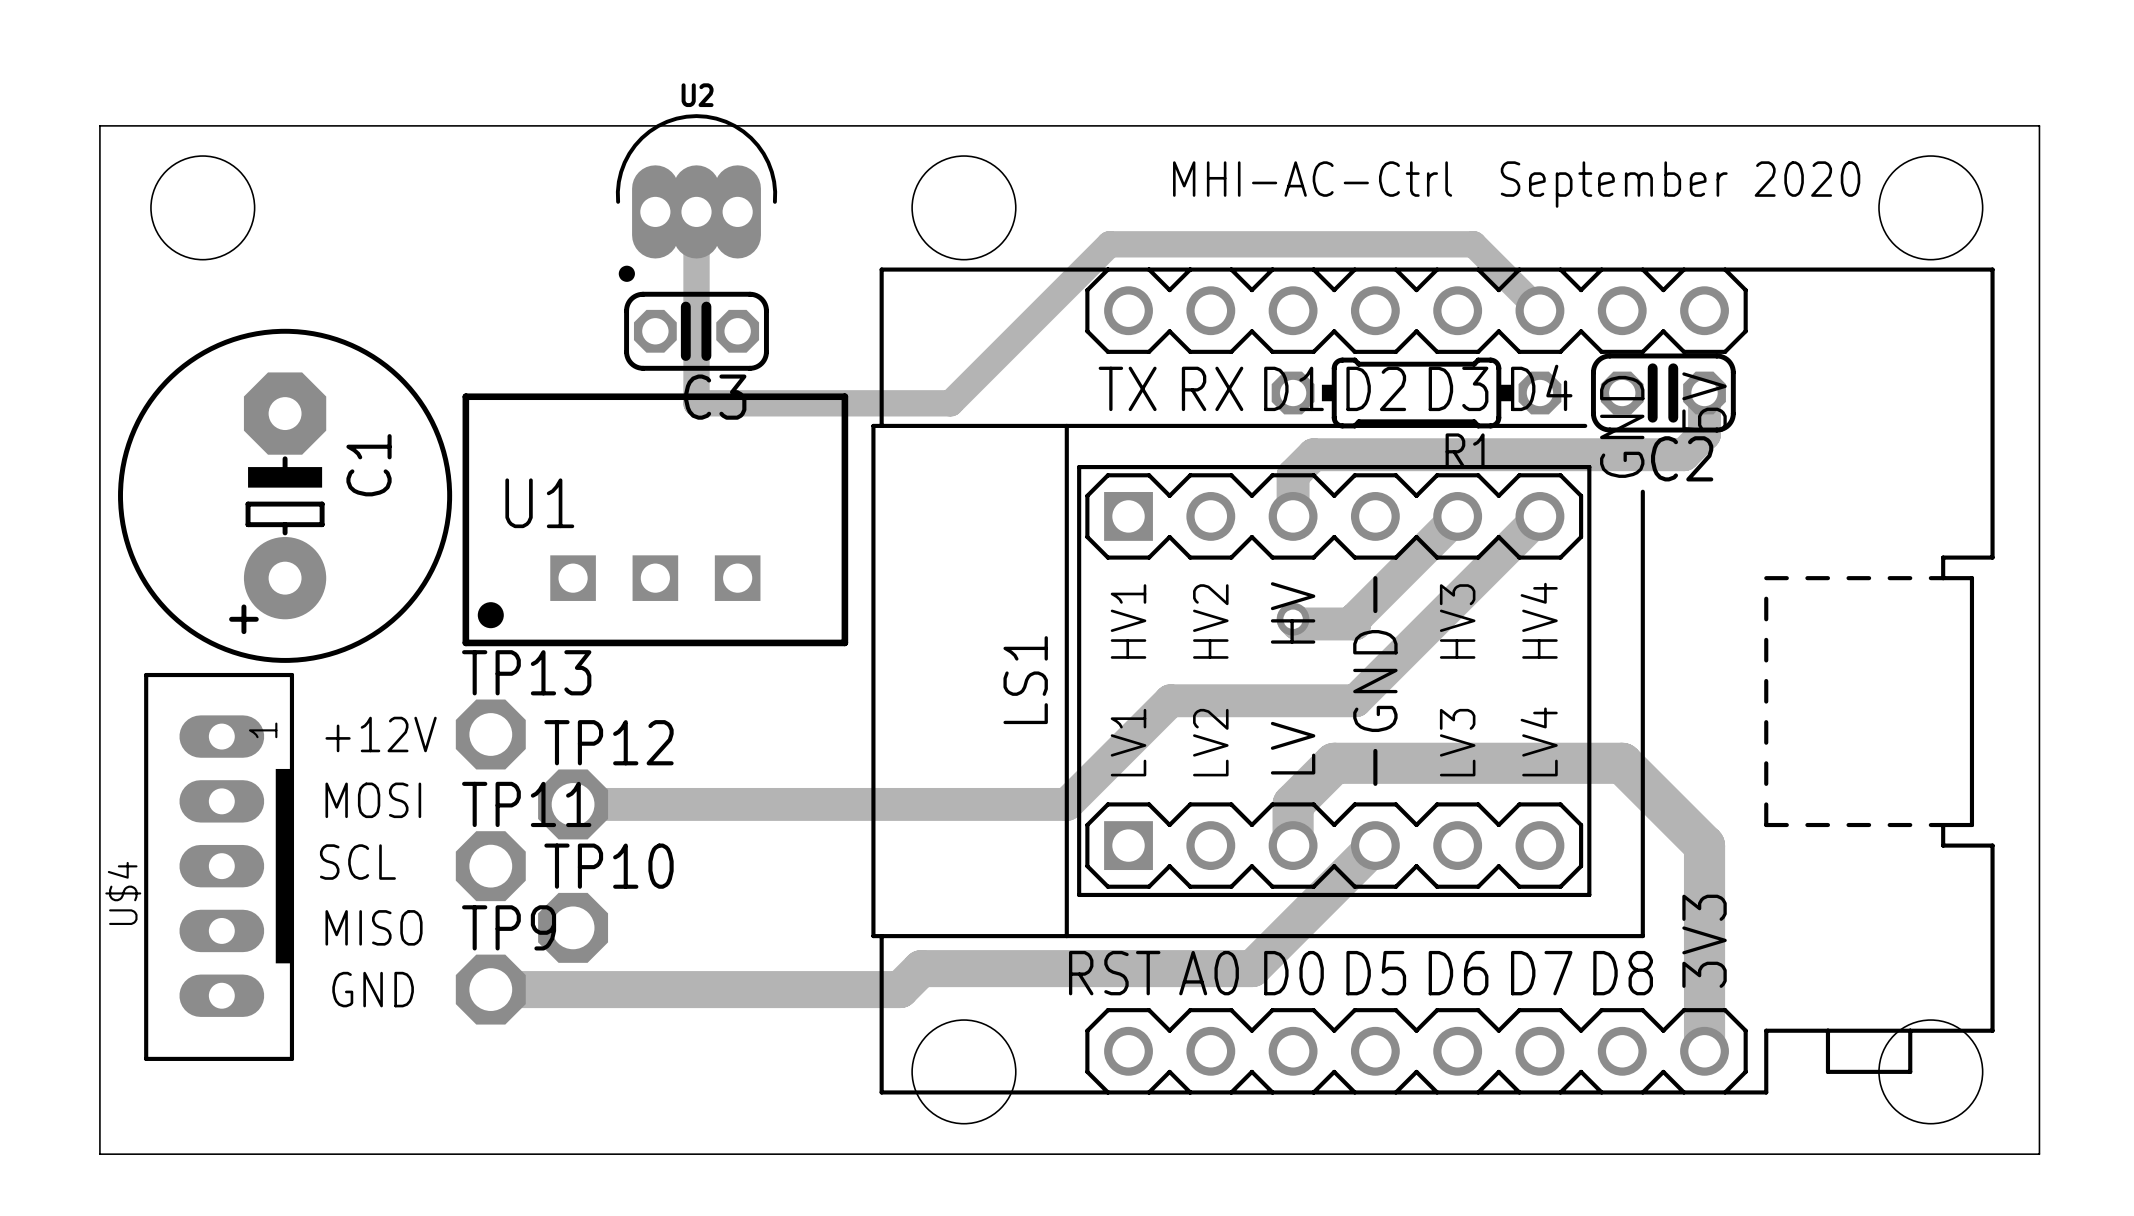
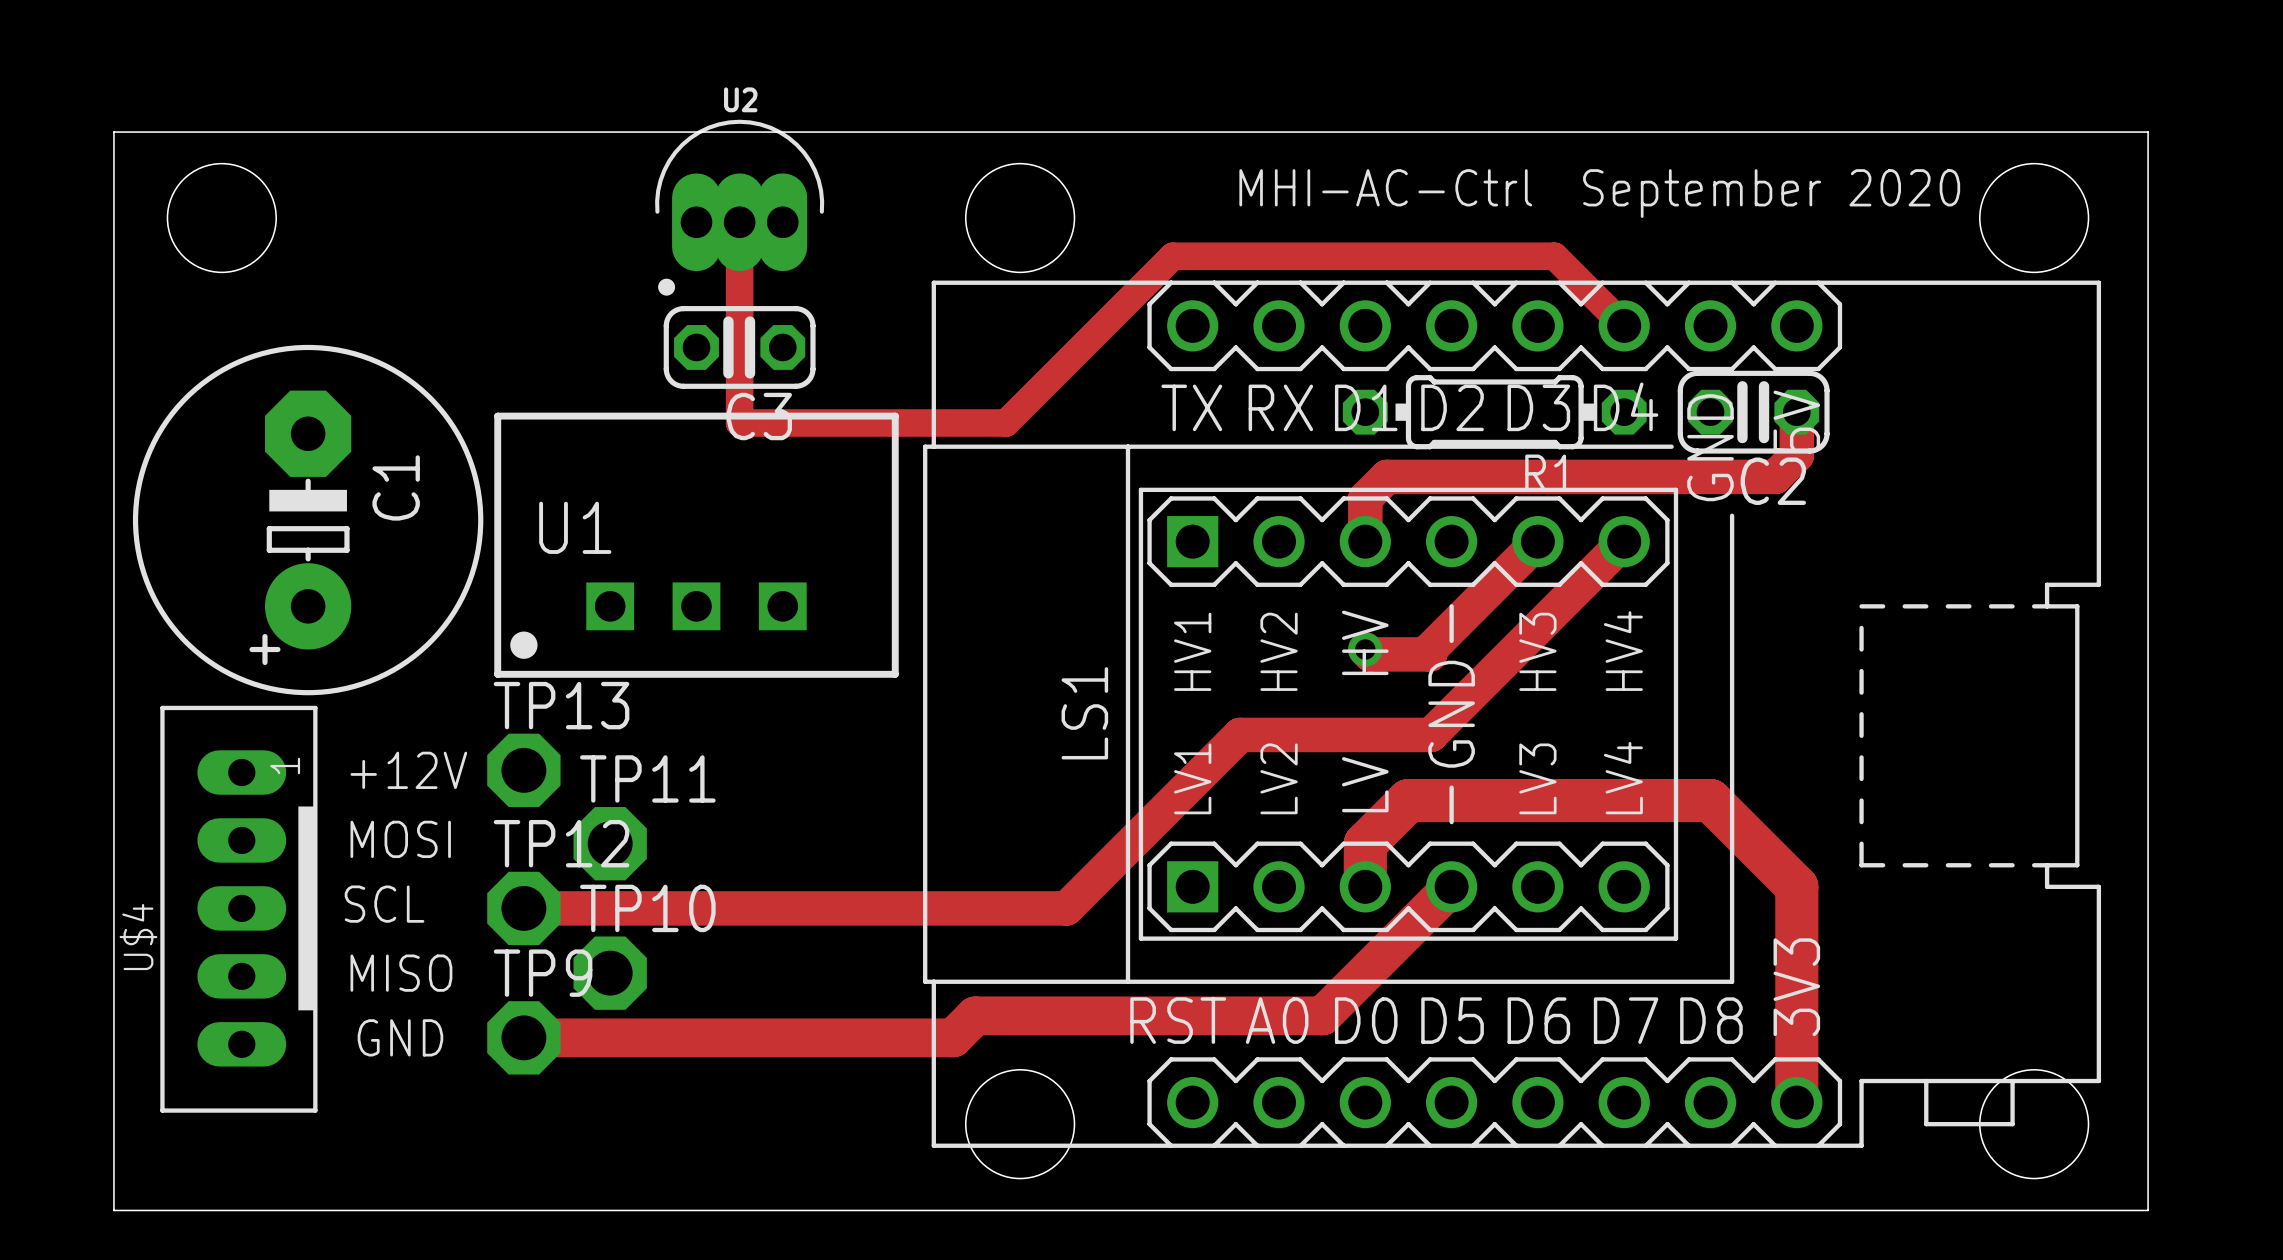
track: (1173, 700) (1170, 700) (1066, 804) (573, 804) (570, 801) -> (1240, 734) (1066, 908) (523, 908)
TP12 name: TP12 (609, 742) -> TP11 (647, 778)
TP11 name: TP11 (526, 804) -> TP12 (561, 843)

